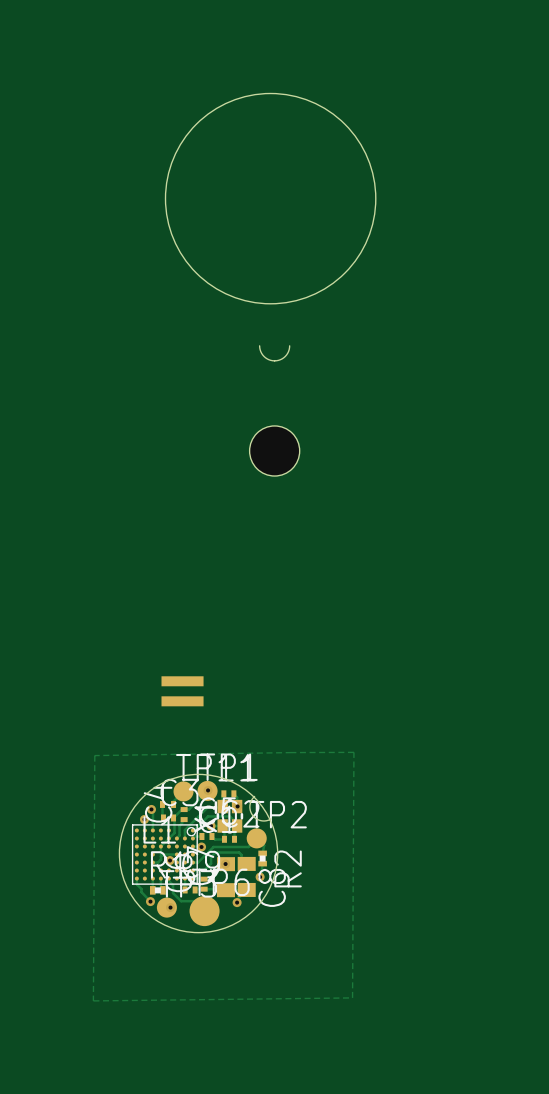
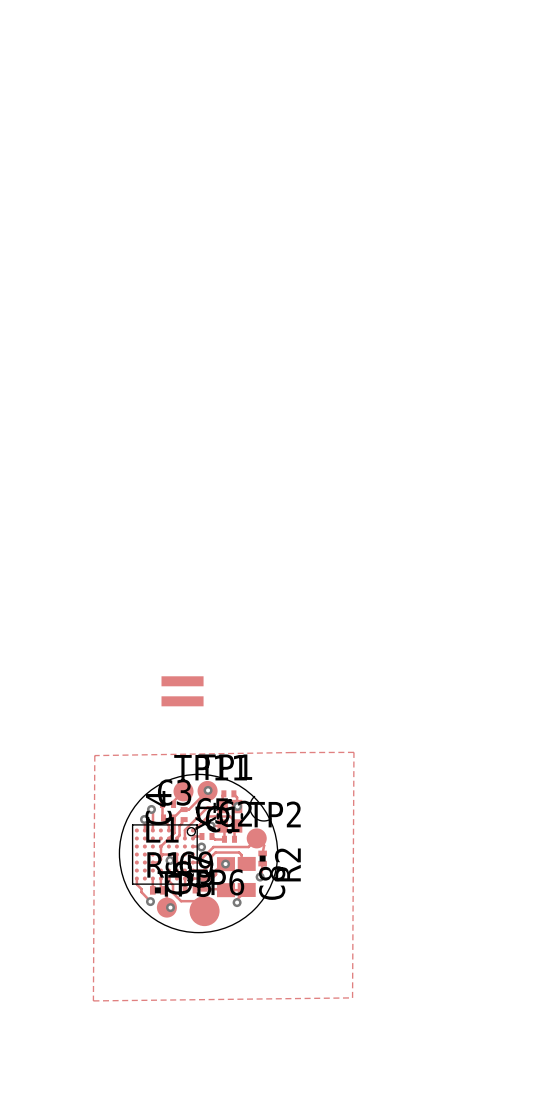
round board edge: [165, 93, 376, 304] -> none
board edge: (259, 345) (264, 356) (274, 360) (285, 356) (289, 345) -> none
hole: (274, 450) -> none

